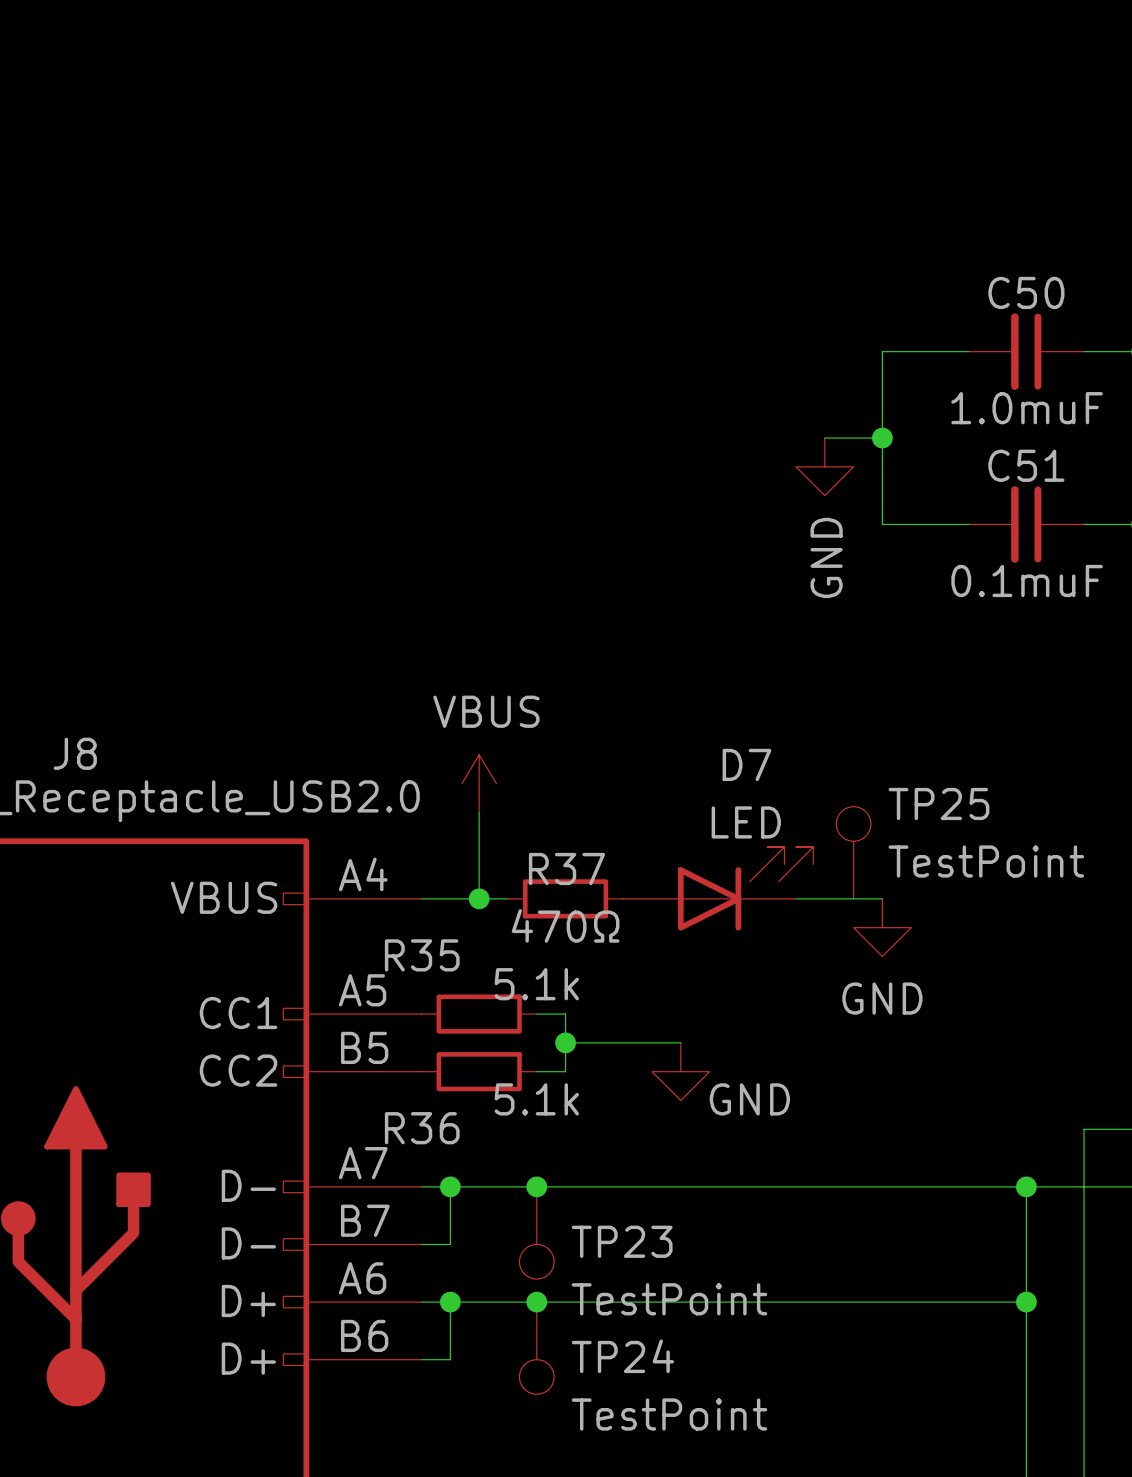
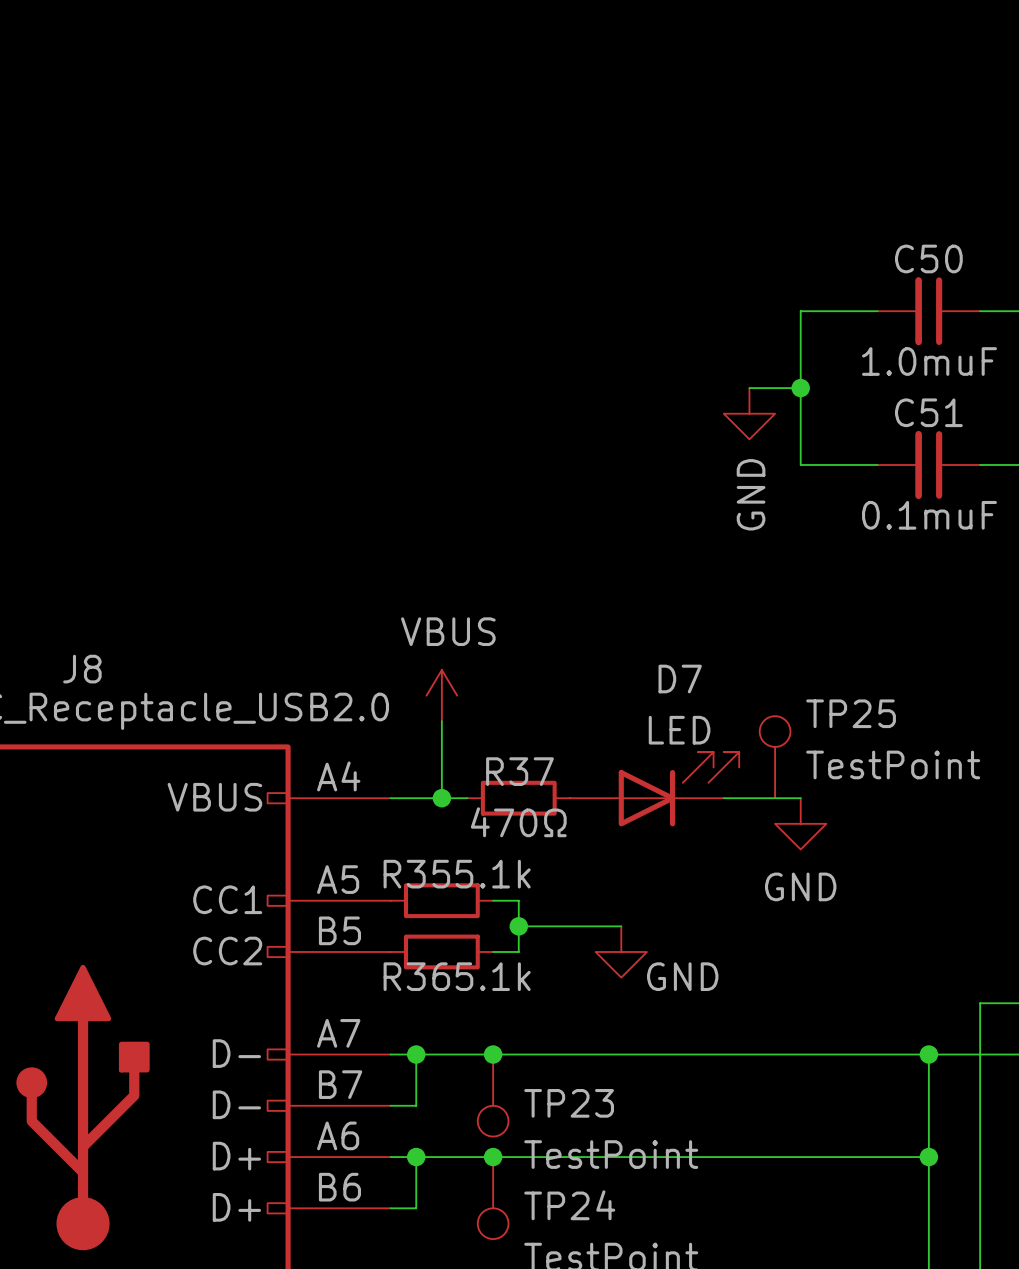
R35 name position: R35 (422, 955) -> R35 (416, 874)
R36 name position: R36 (422, 1128) -> R36 (416, 976)

